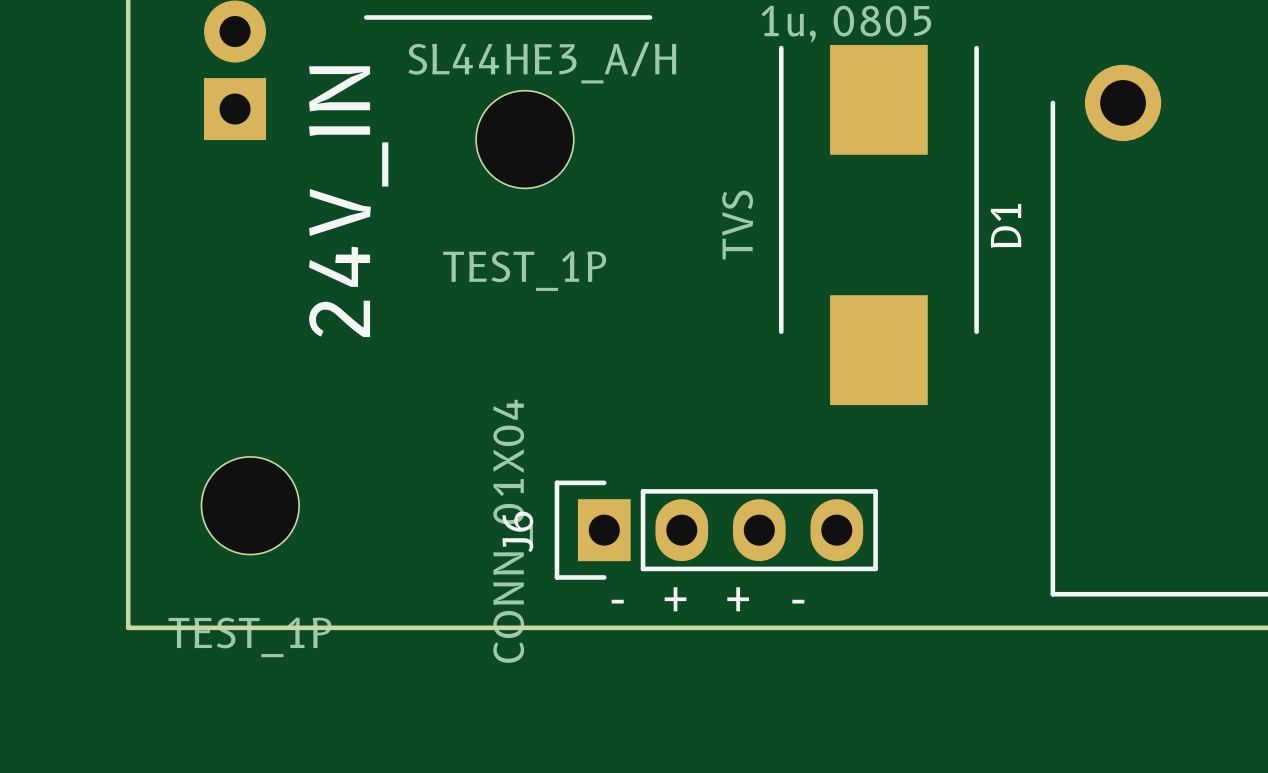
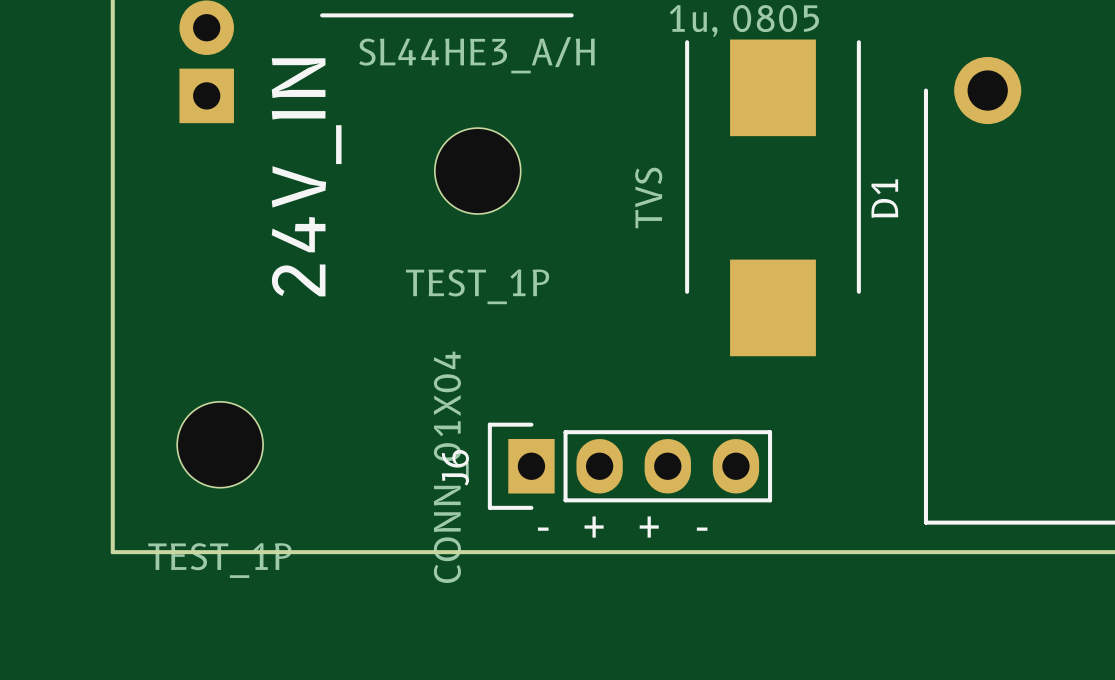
part position: (524, 139) -> (477, 171)

